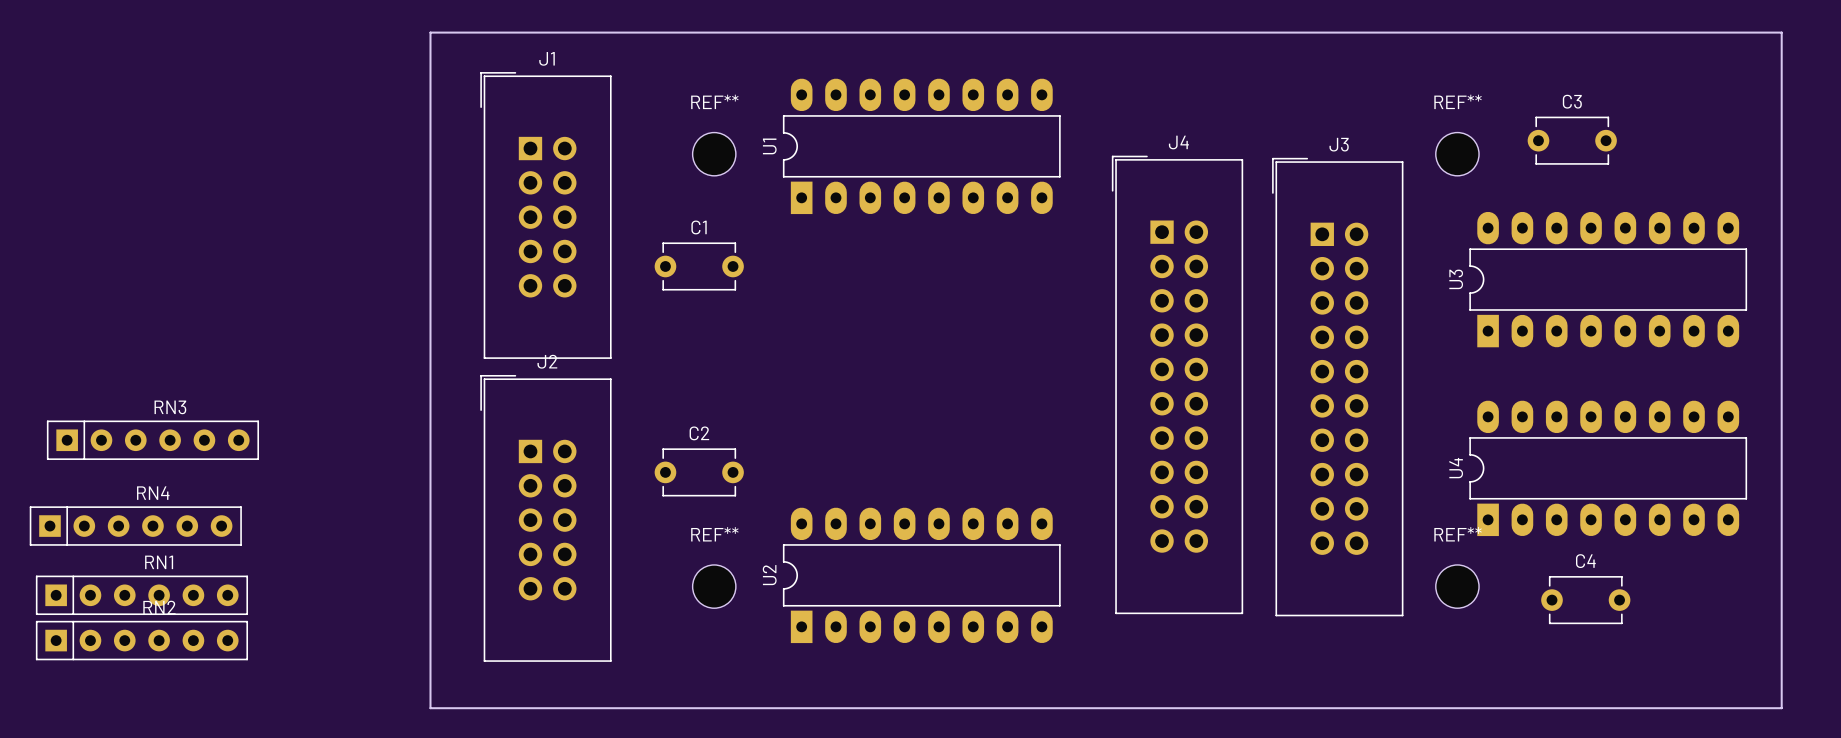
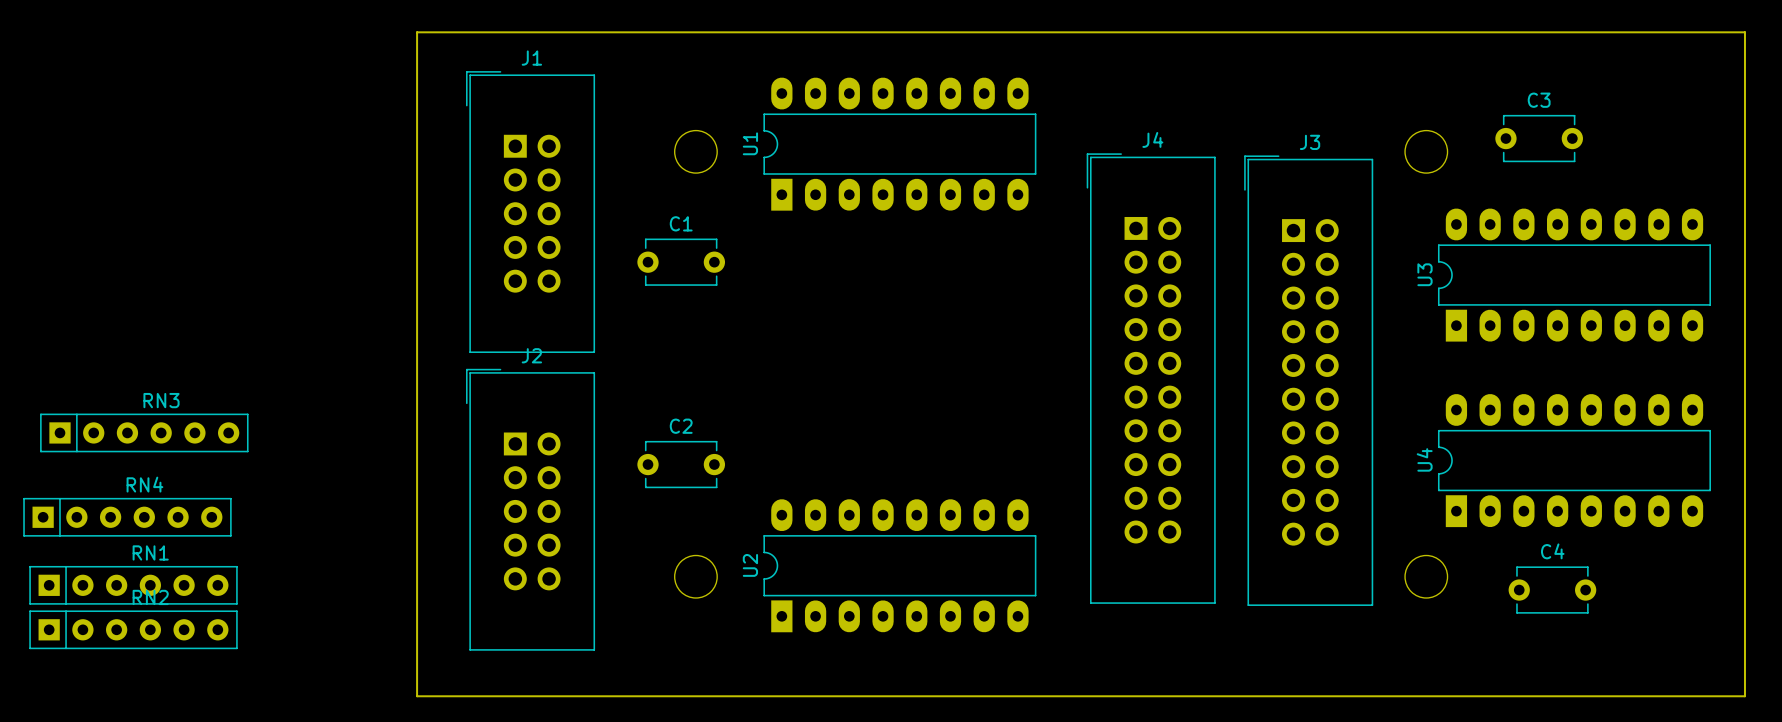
REF** name: REF** (714, 101) -> none
REF** name: REF** (1458, 101) -> none
REF** name: REF** (714, 534) -> none
REF** name: REF** (1458, 534) -> none

